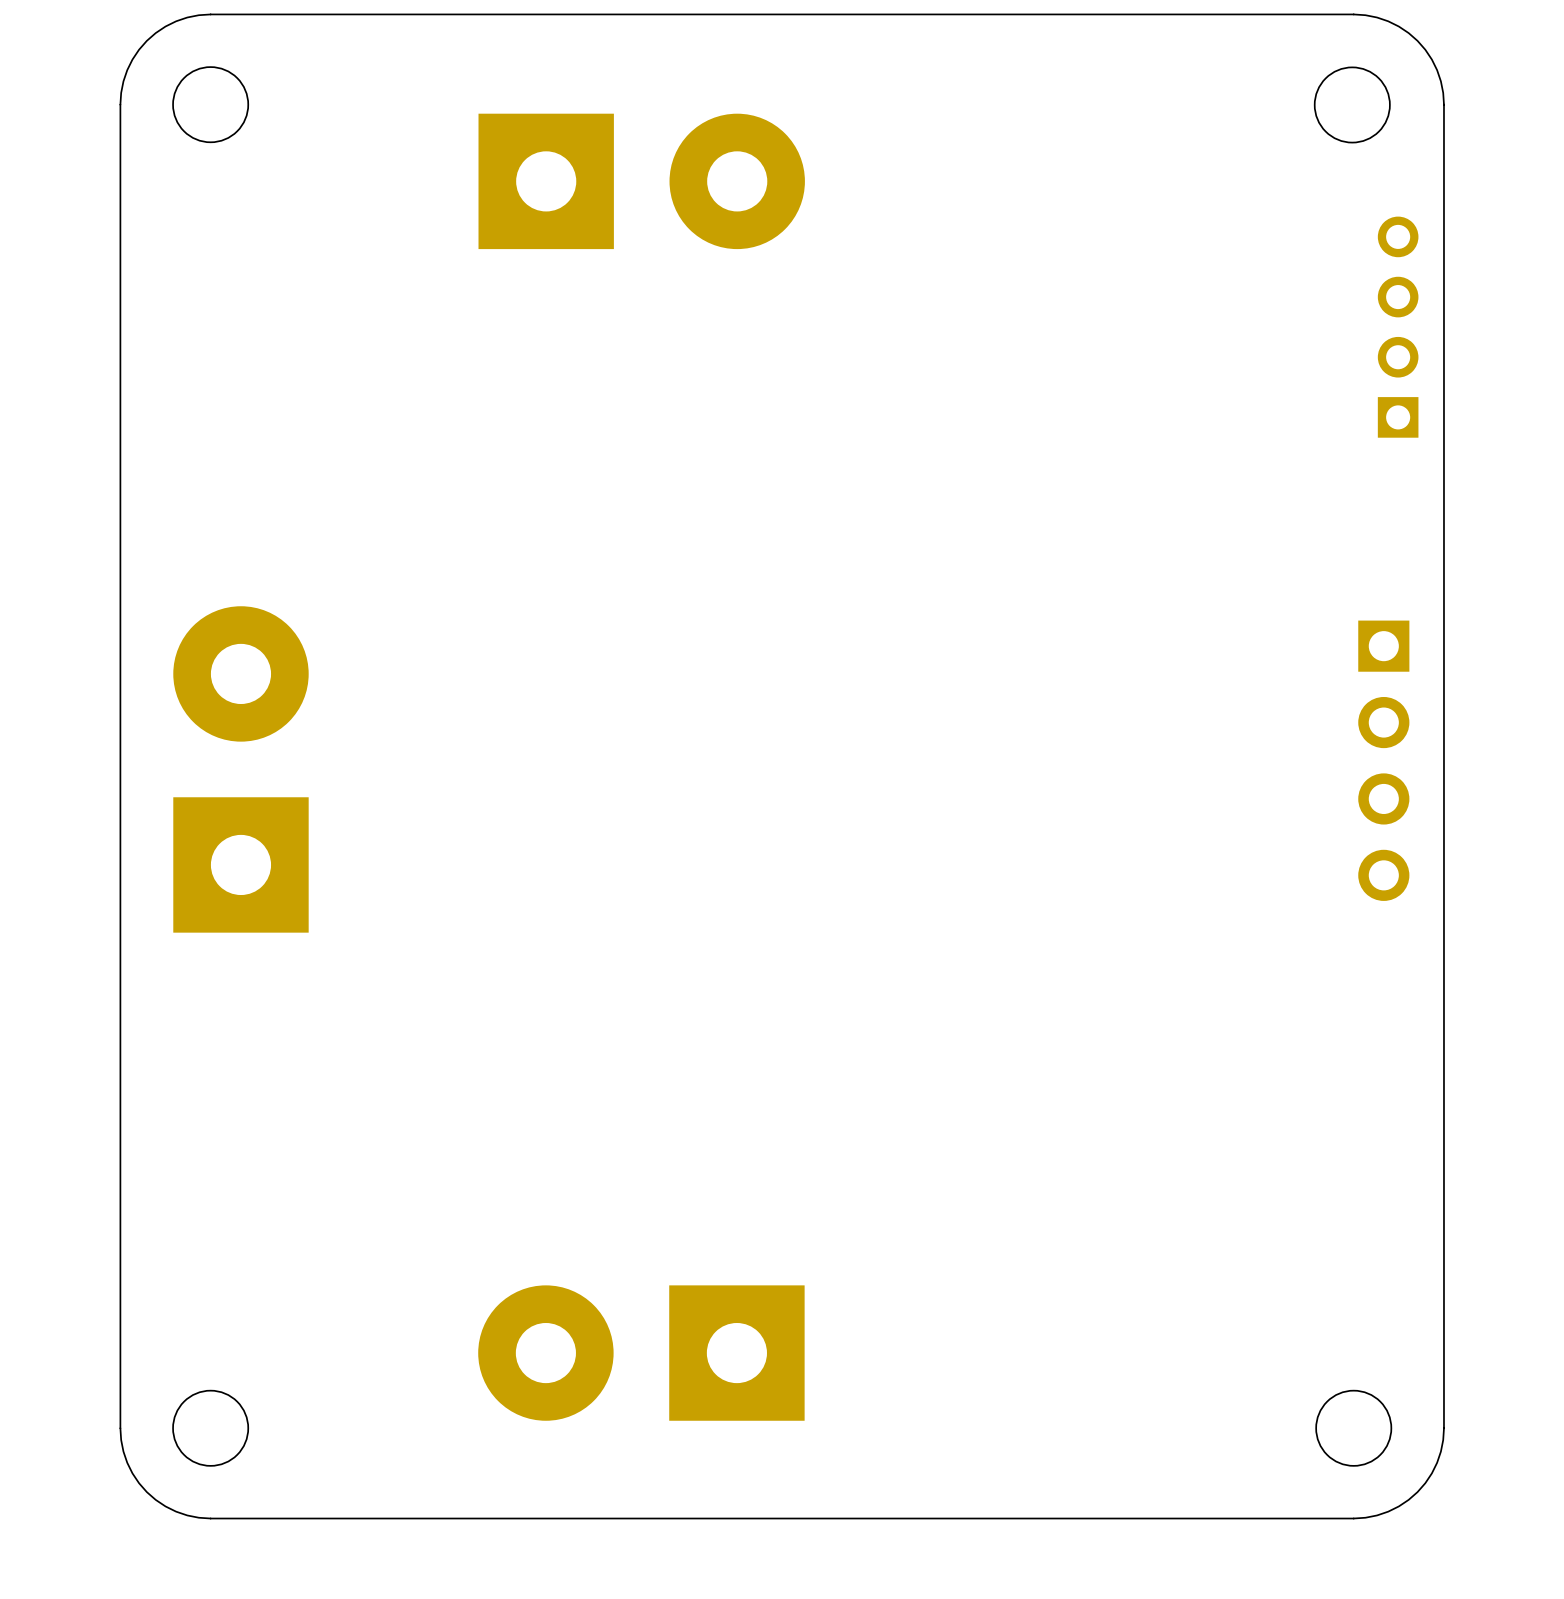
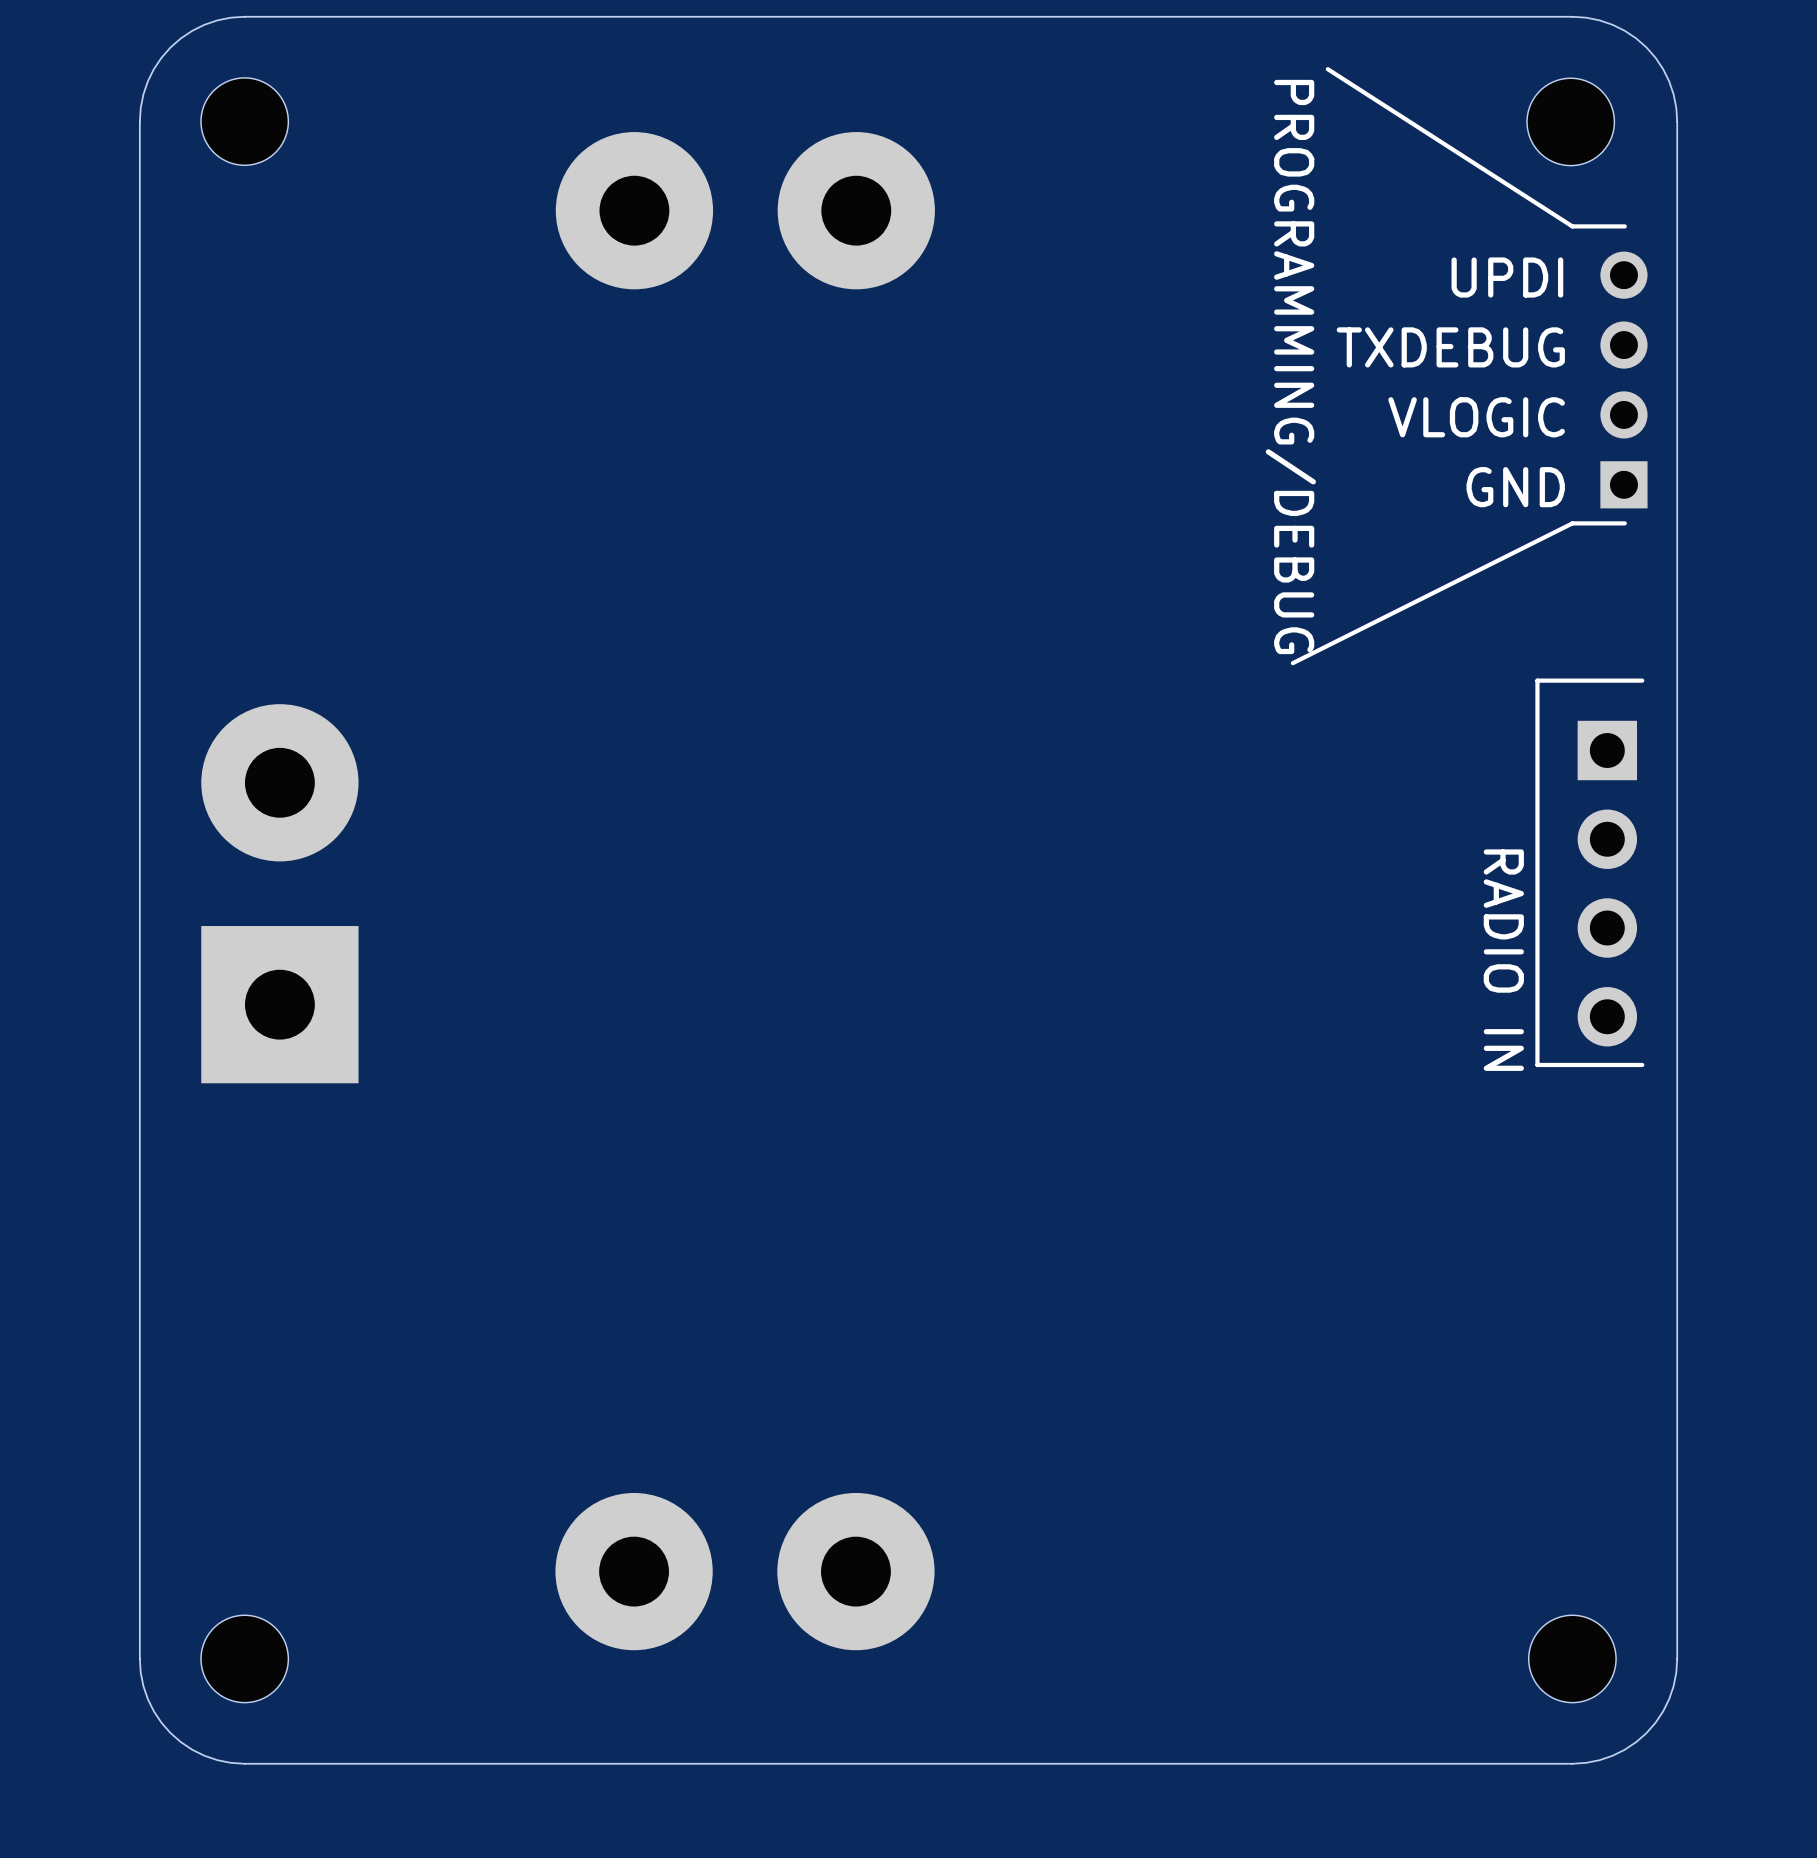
line: none -> (1327, 69) (1572, 226) (1624, 226)
part footprint: [478, 113, 805, 250] -> [555, 132, 935, 290]
text: none -> UPDI (1507, 277)
text: none -> TXDEBUG (1450, 347)
text: none -> PROGRAMMING/DEBUG (1290, 367)
text: none -> VLOGIC (1476, 417)
text: none -> GND (1515, 487)
line: none -> (1624, 523) (1572, 523) (1292, 663)
line: none -> (1642, 680) (1537, 680) (1537, 1064) (1642, 1064)
text: none -> RADIO IN (1503, 960)
part footprint: [478, 1285, 805, 1421] -> [555, 1492, 935, 1651]

